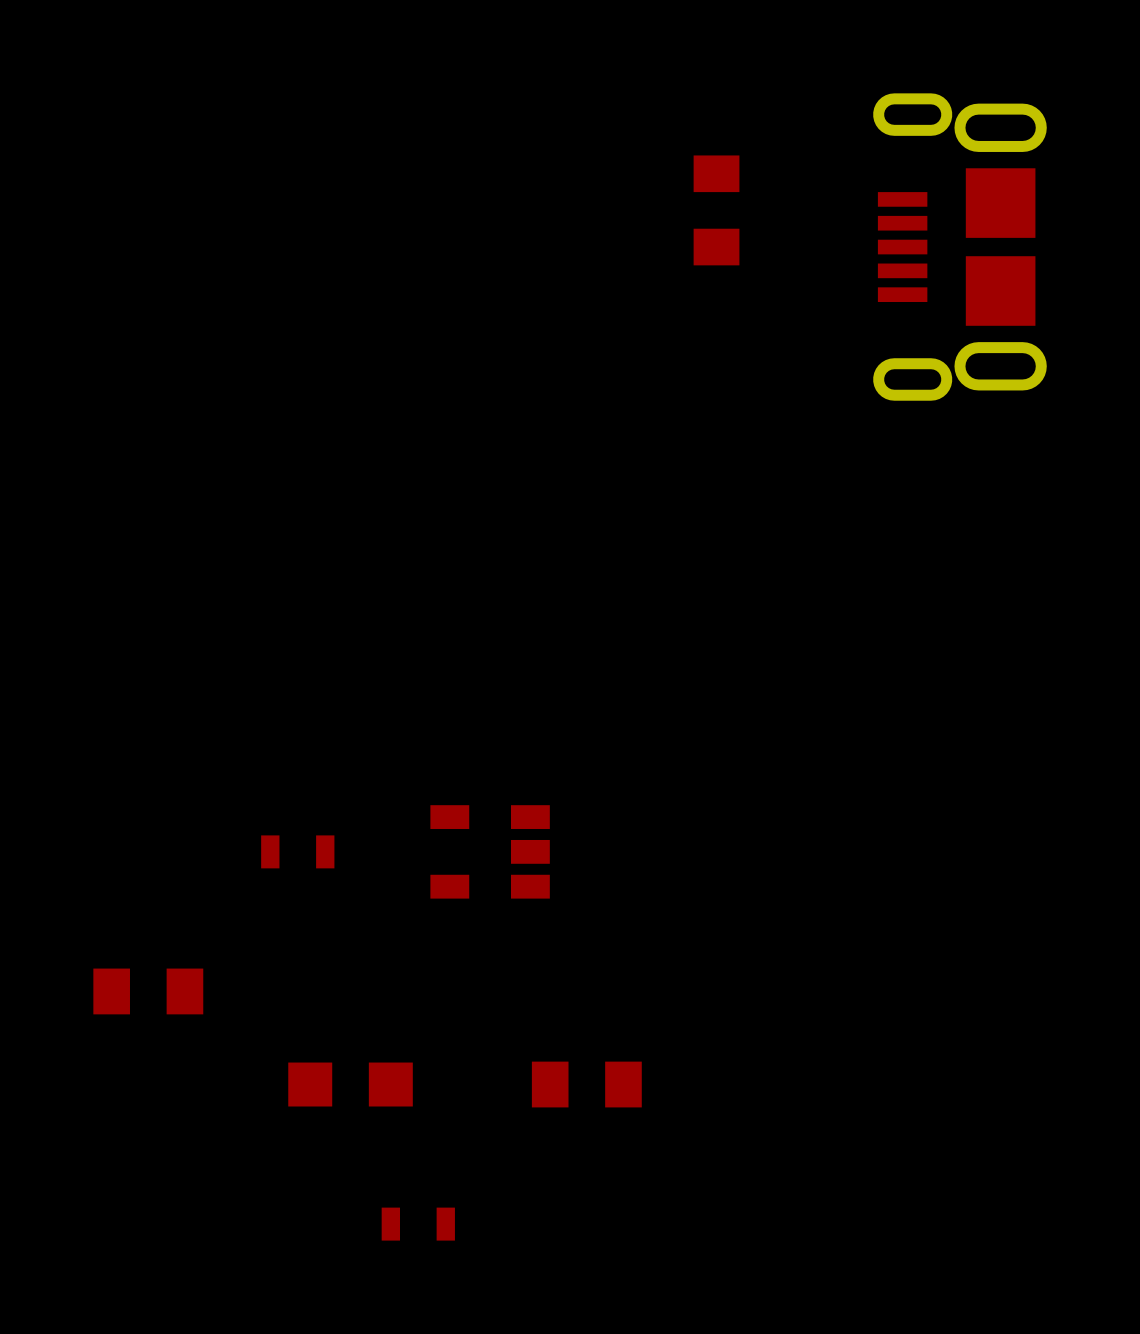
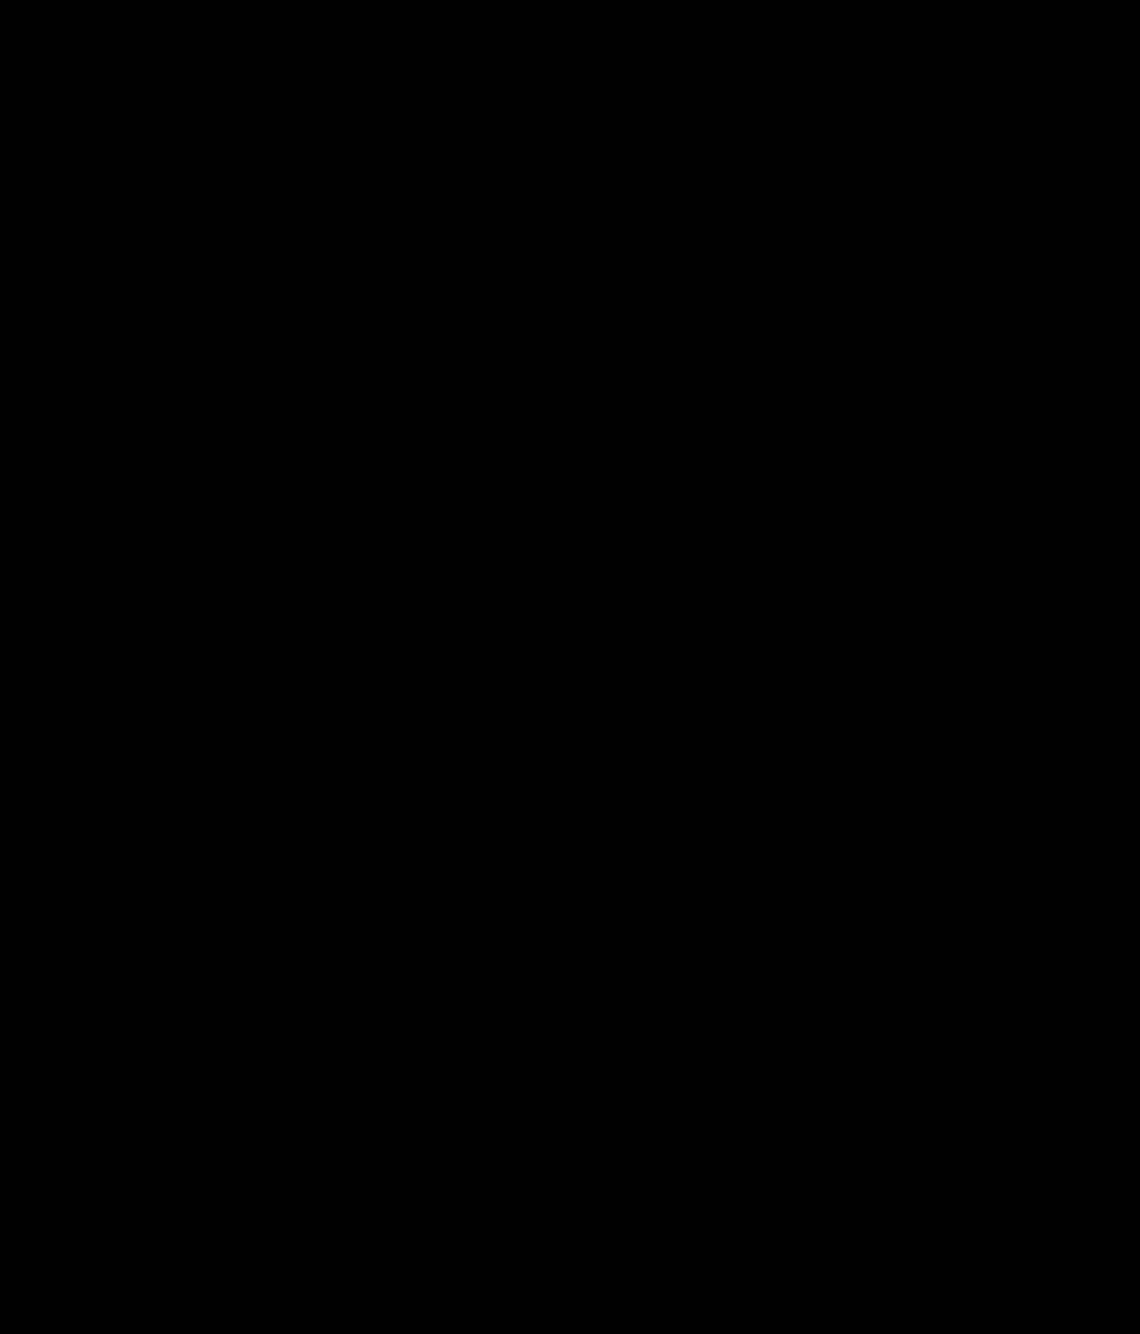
part: (716, 210) -> none
part: (959, 247) -> none
part: (297, 851) -> none
part: (490, 851) -> none
part: (148, 991) -> none
part: (350, 1084) -> none
part: (586, 1084) -> none
part: (418, 1224) -> none

